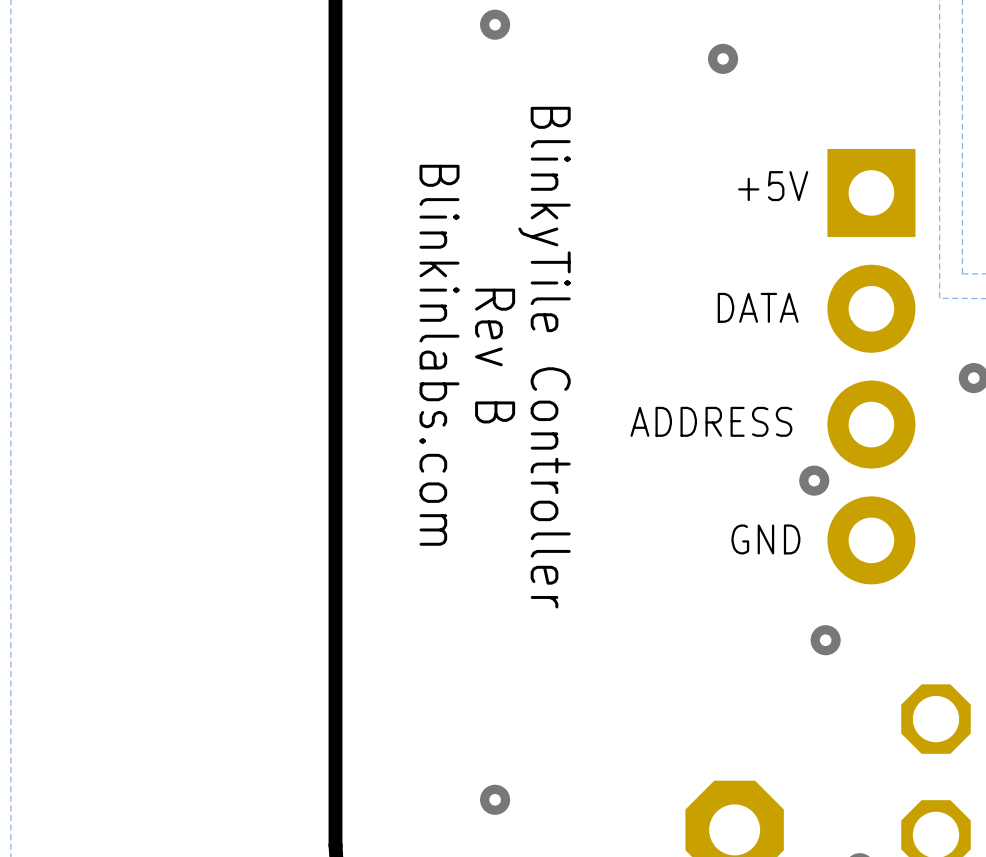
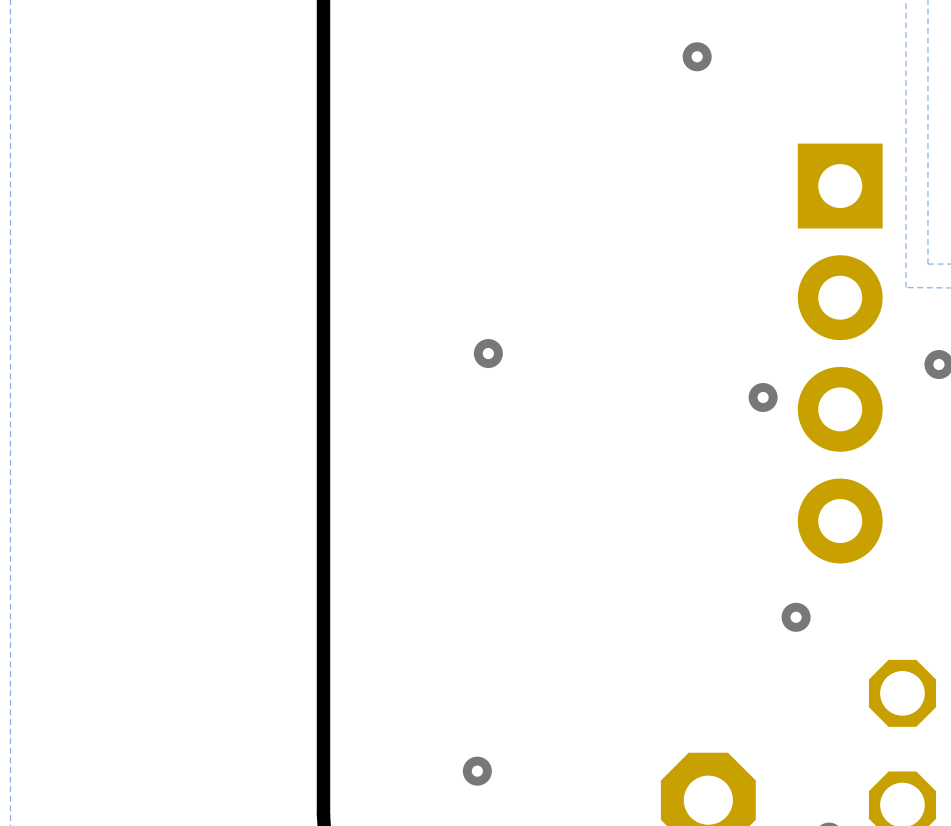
via: (495, 24) -> none
text: +5V (773, 186) -> none
text: DATA (758, 307) -> none
text: Blinkinlabs.com (439, 355) -> none
text: Rev B (495, 356) -> none
text: BlinkyTile Controller (544, 357) -> none
via: none -> (488, 353)
text: ADDRESS (711, 421) -> none
via position: (814, 480) -> (763, 397)
text: GND (765, 539) -> none

